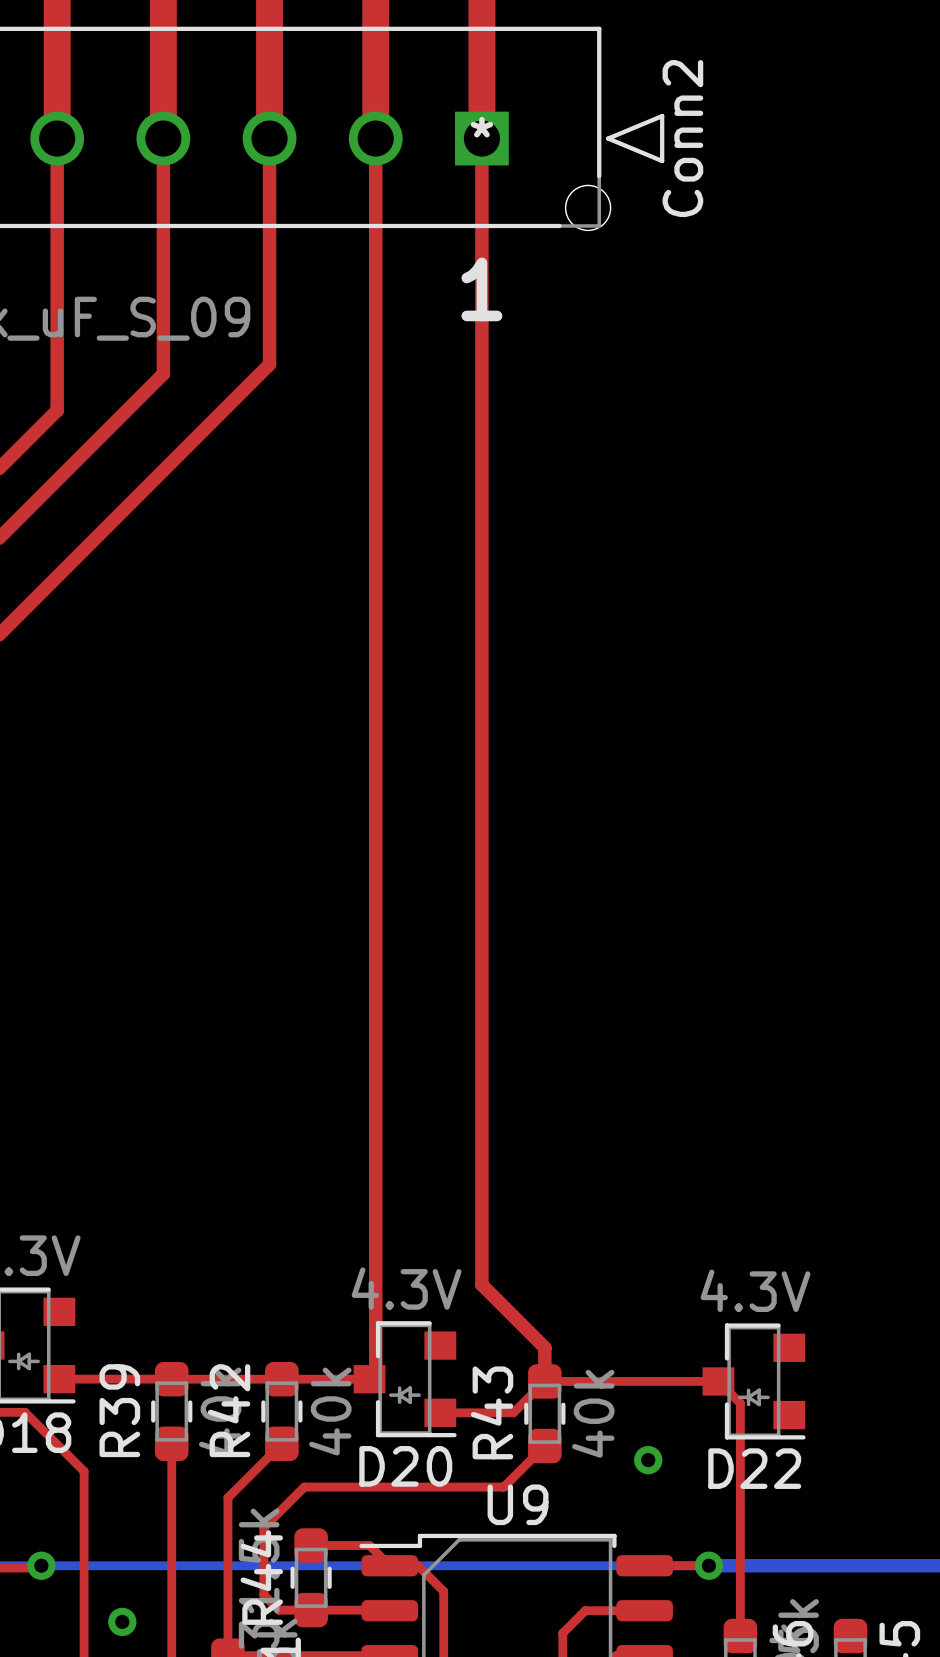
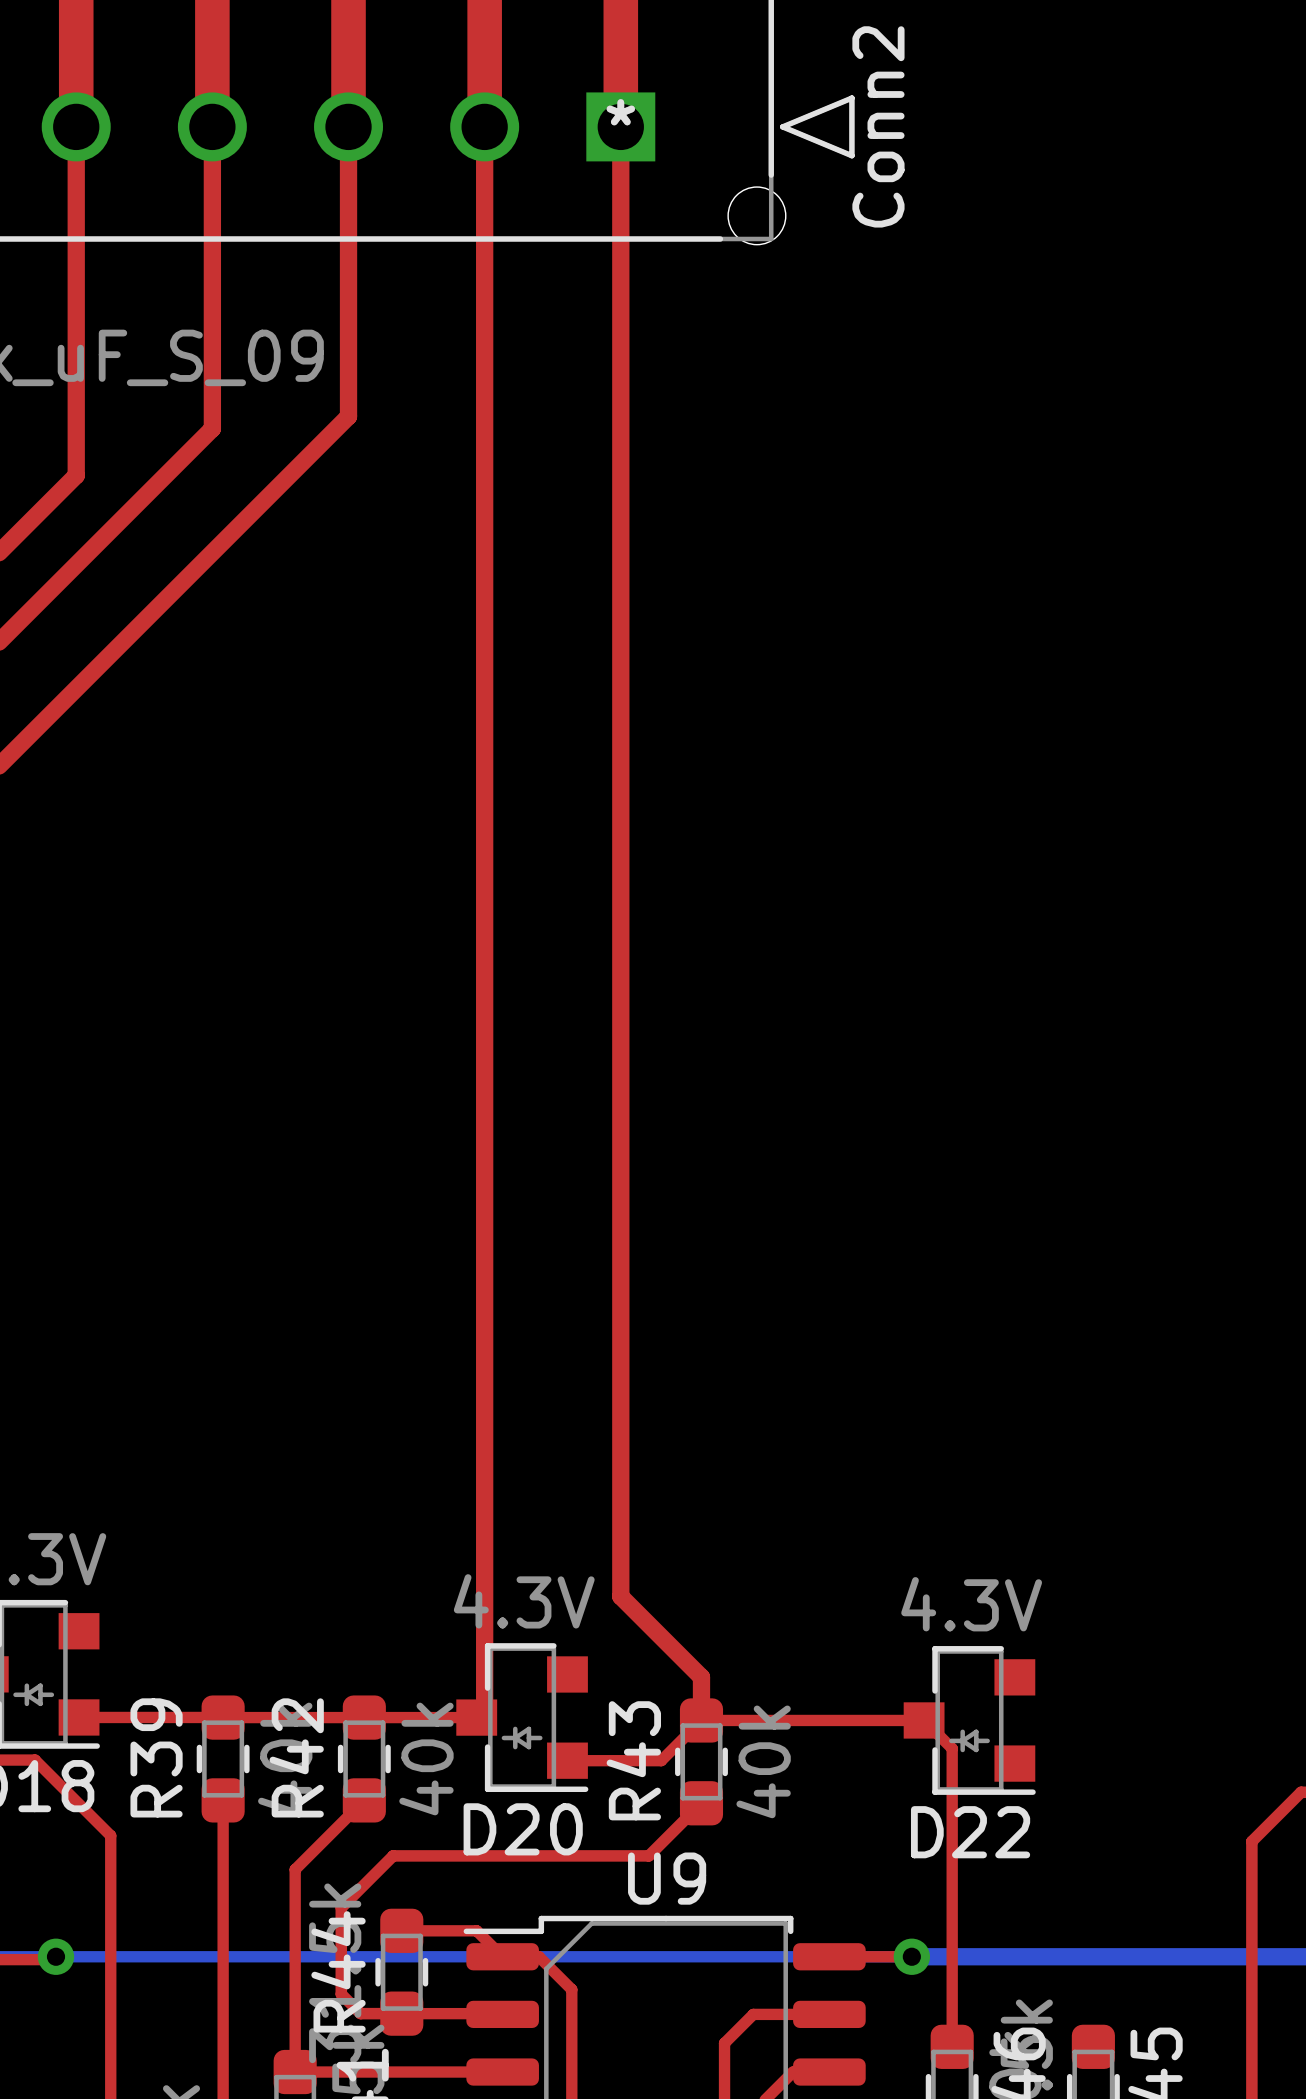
text: 1 (481, 289) -> none
via: (648, 1460) -> none
via: (122, 1621) -> none

